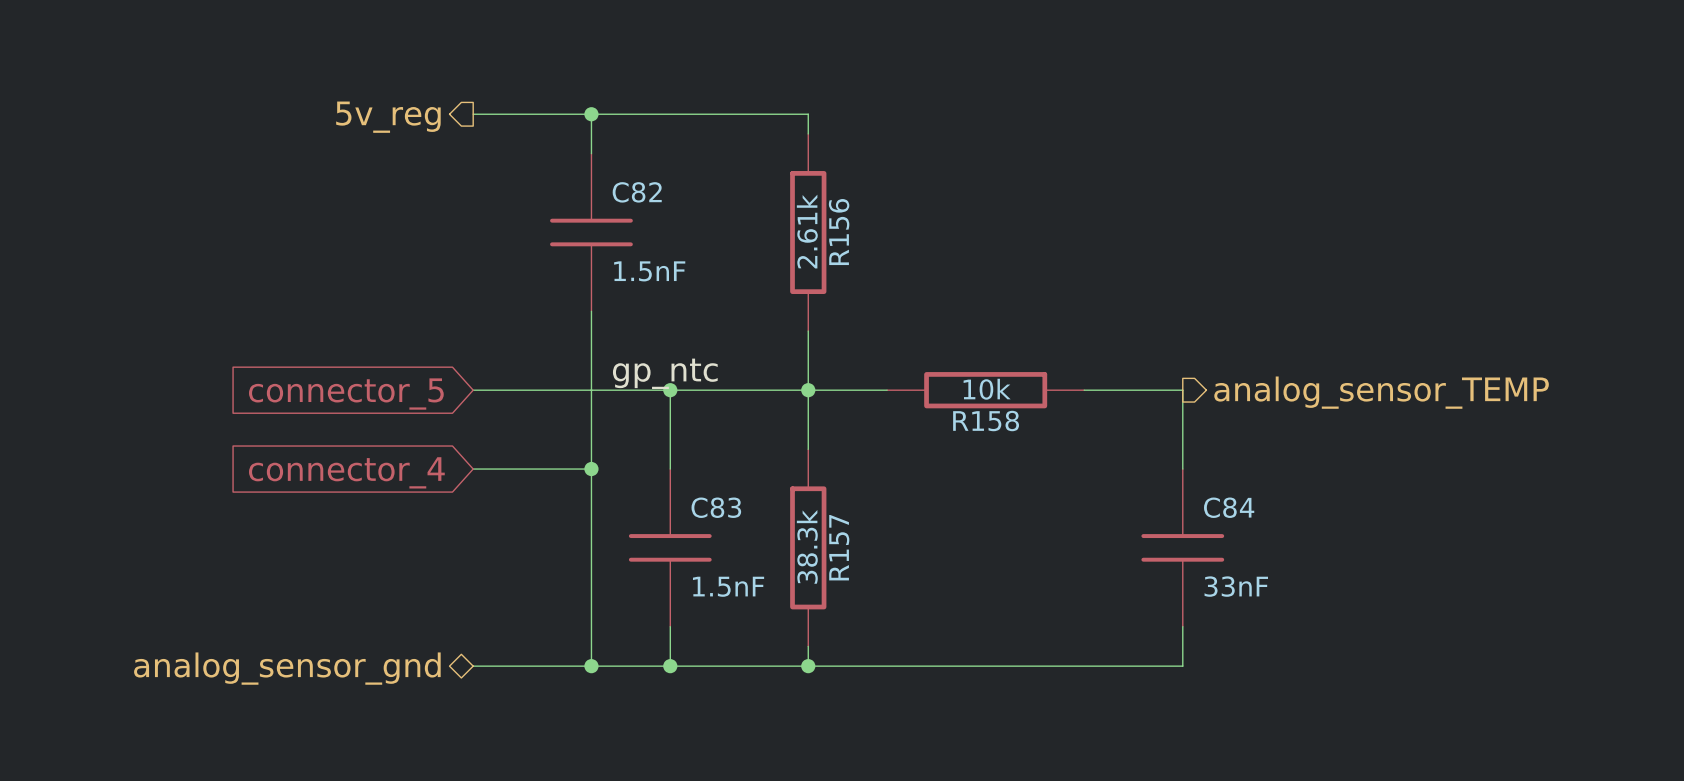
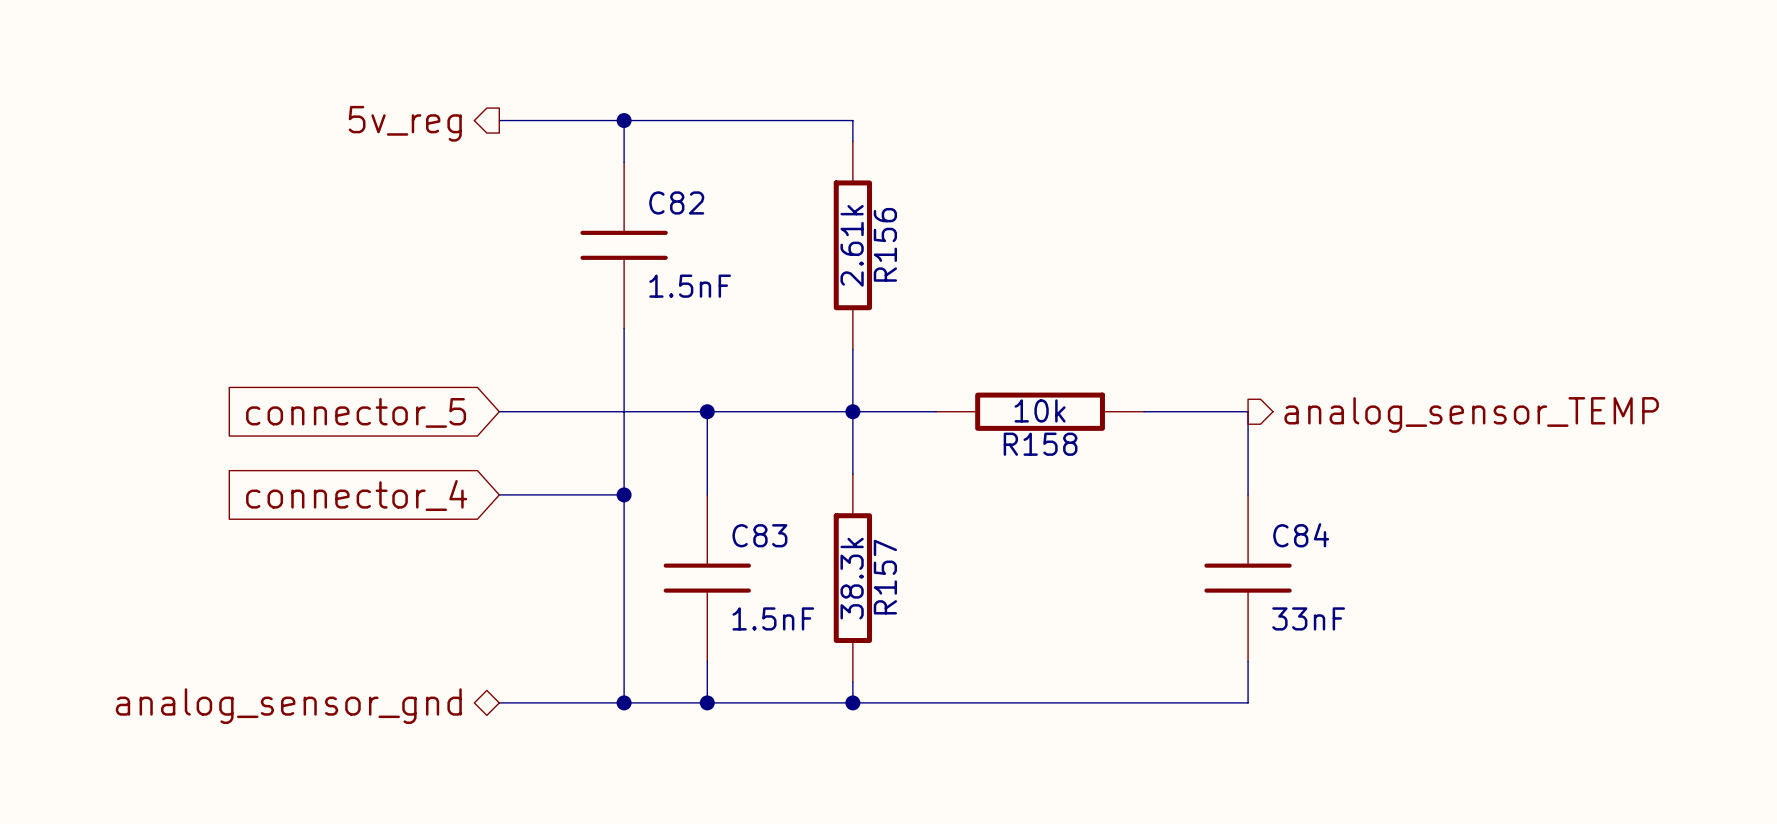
label: gp_ntc (665, 373) -> none

